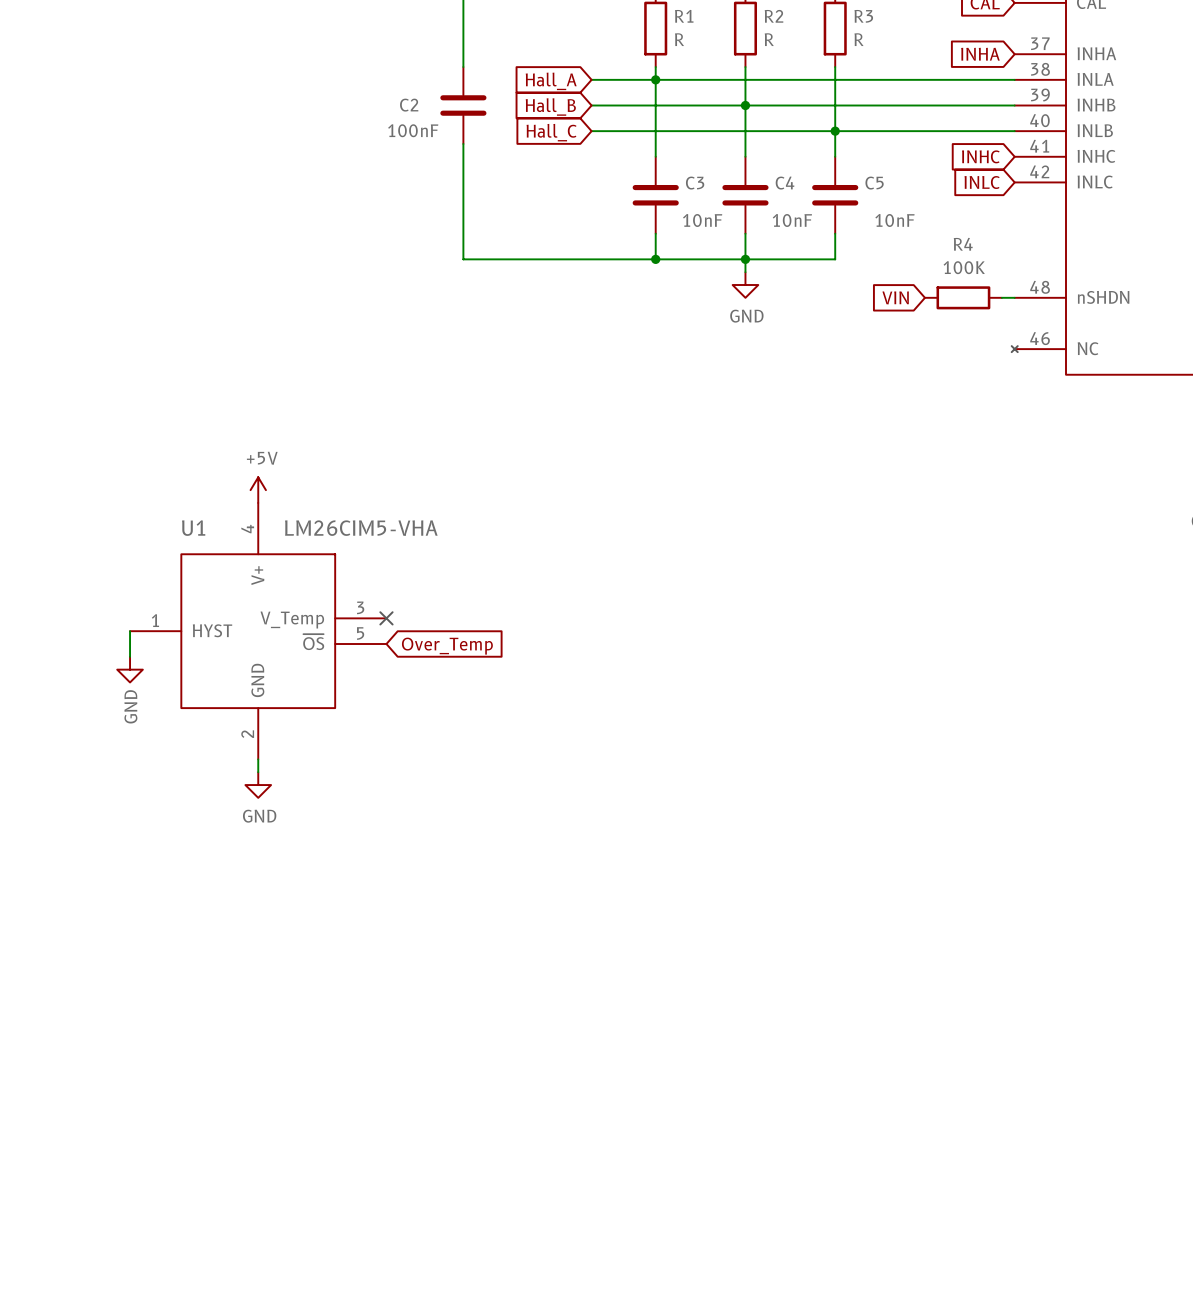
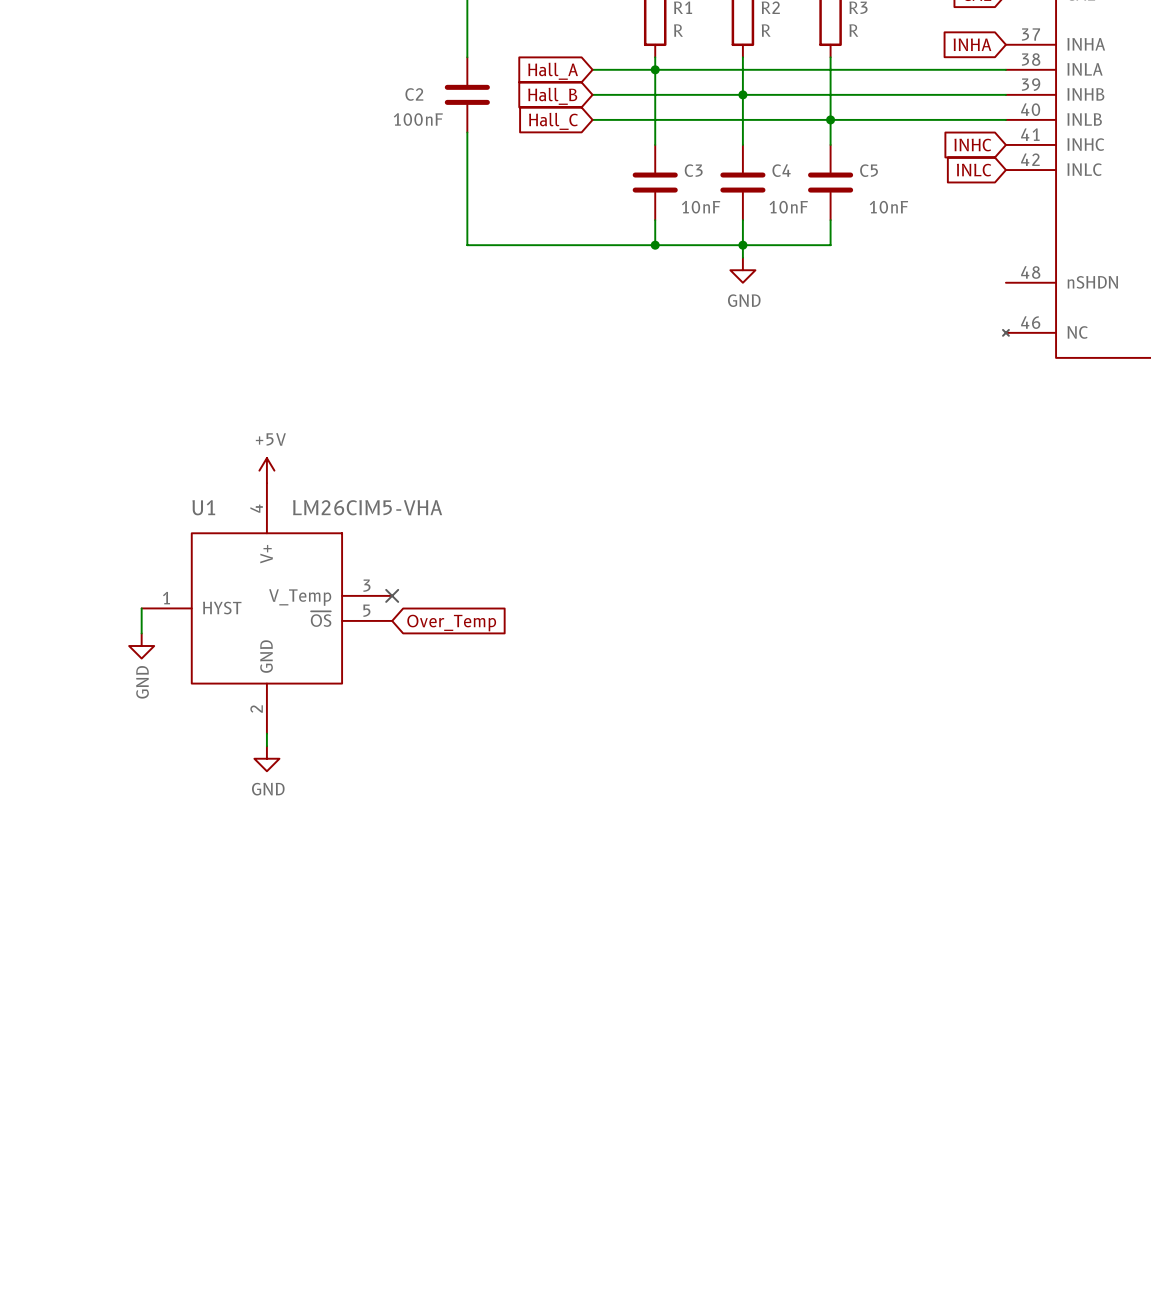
global label: VIN (895, 297) -> none
R4: 100K (963, 297) -> none
wire: (1001, 297) (1014, 297) -> none

